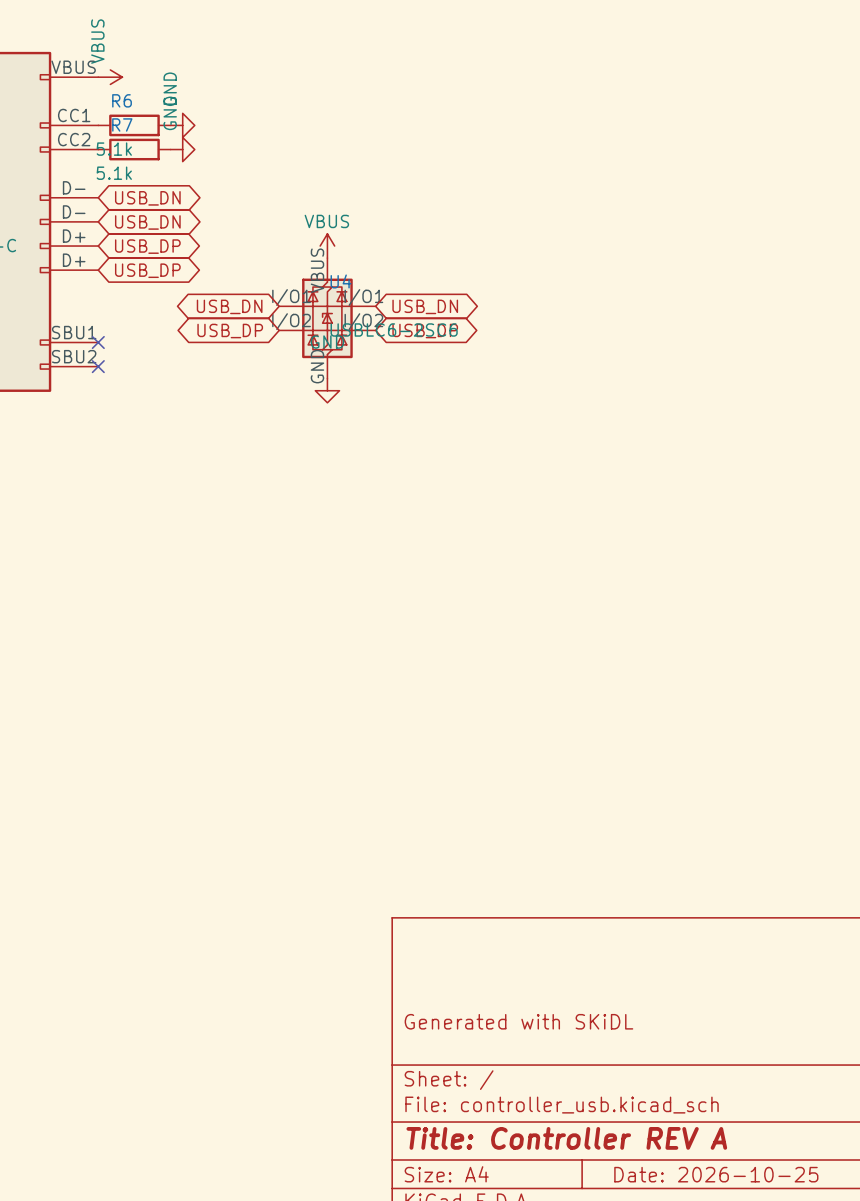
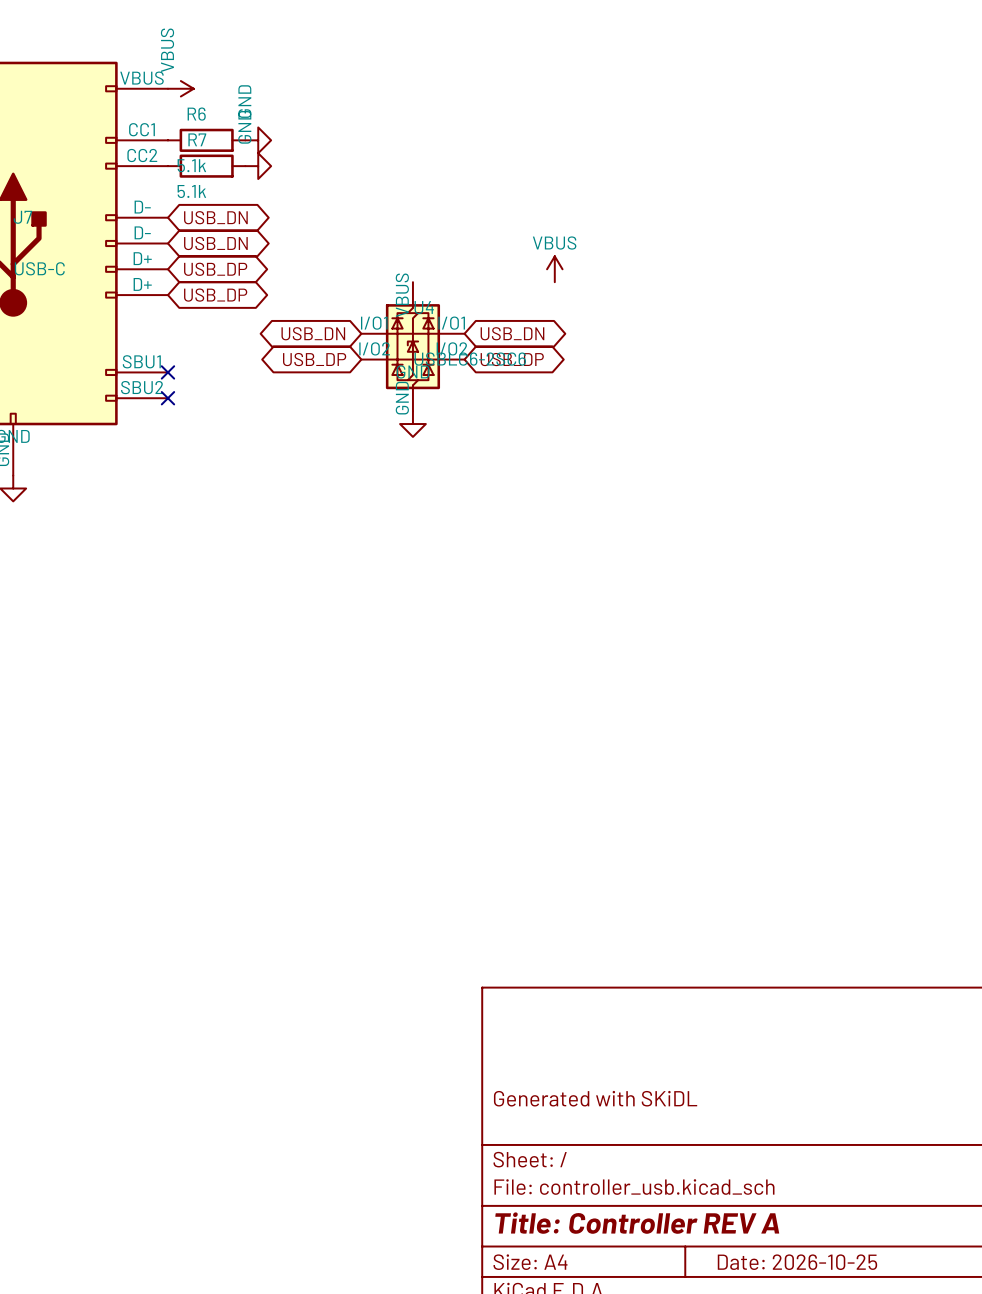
power symbol position: VBUS (327, 246) -> VBUS (554, 269)

